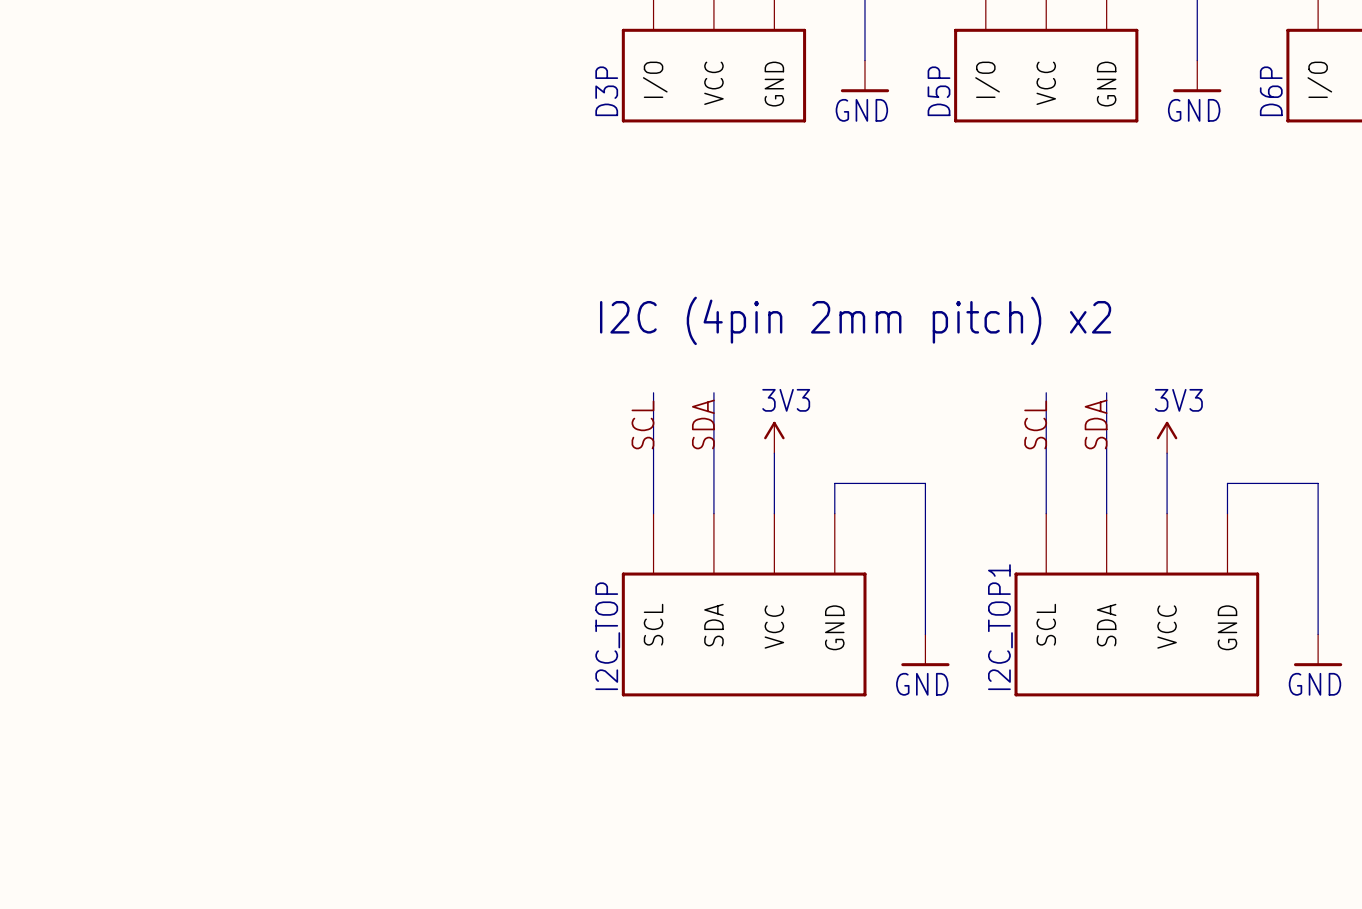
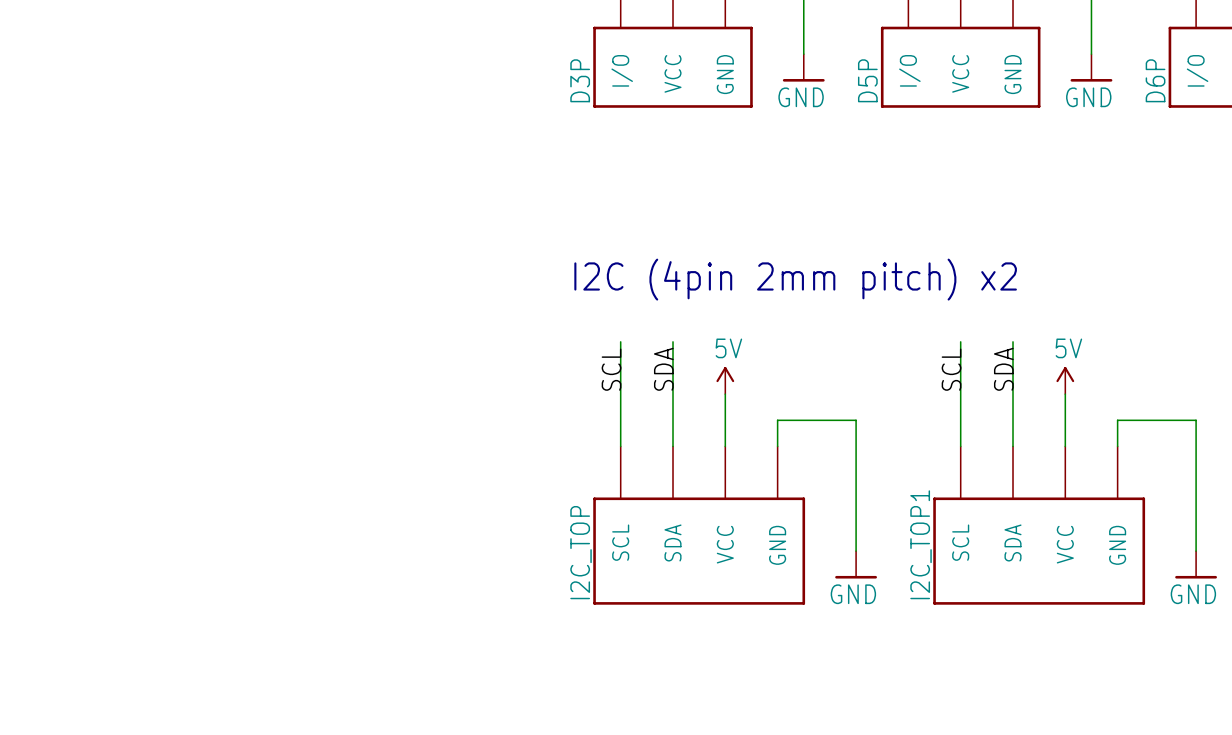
power symbol: 3V3 (774, 437) -> 5V (725, 380)
power symbol: 3V3 (1167, 437) -> 5V (1065, 380)

